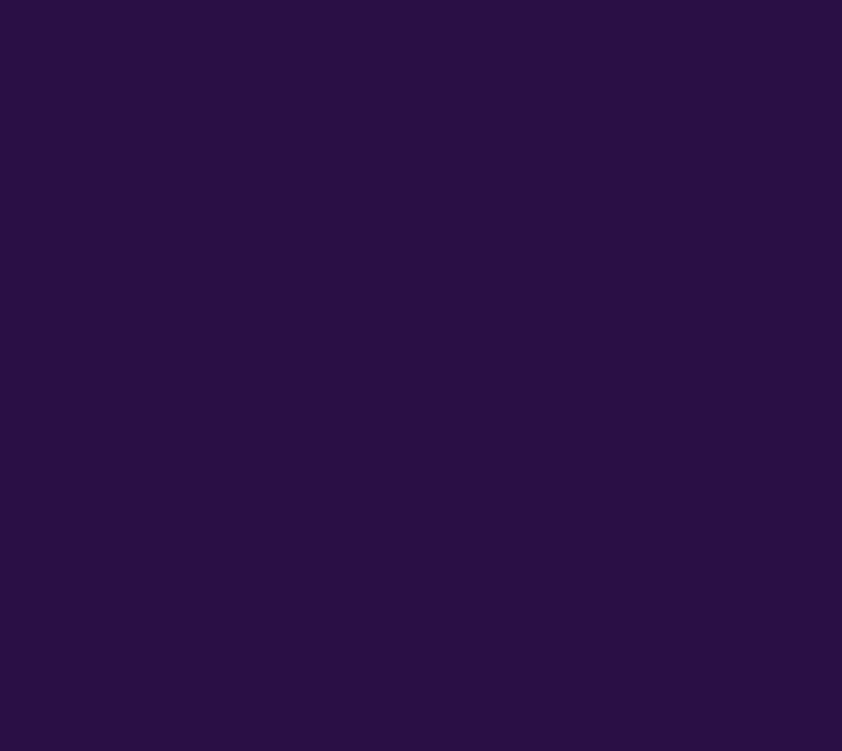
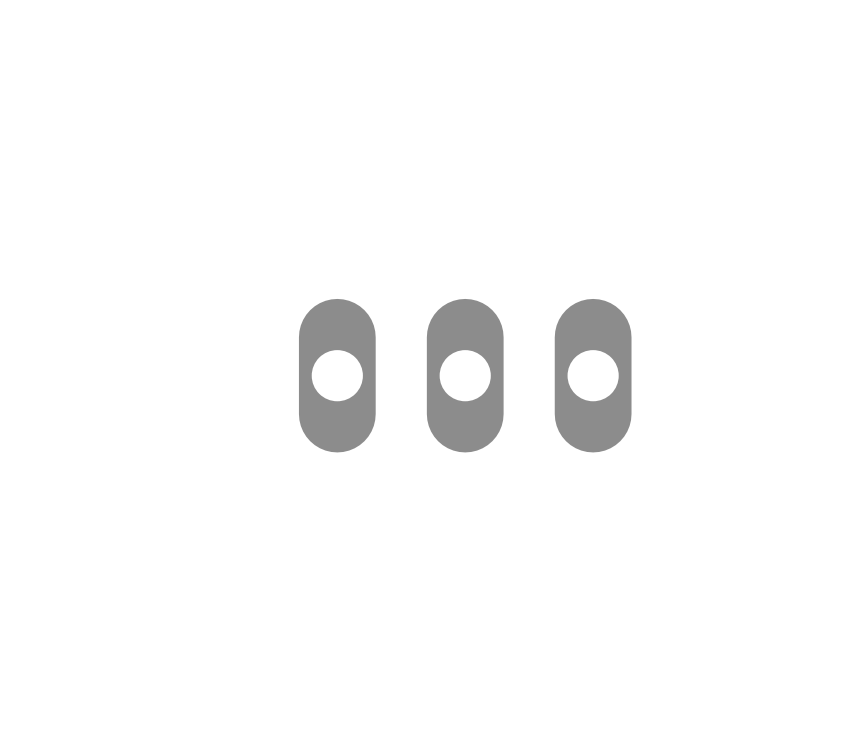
part: none -> (465, 375)

